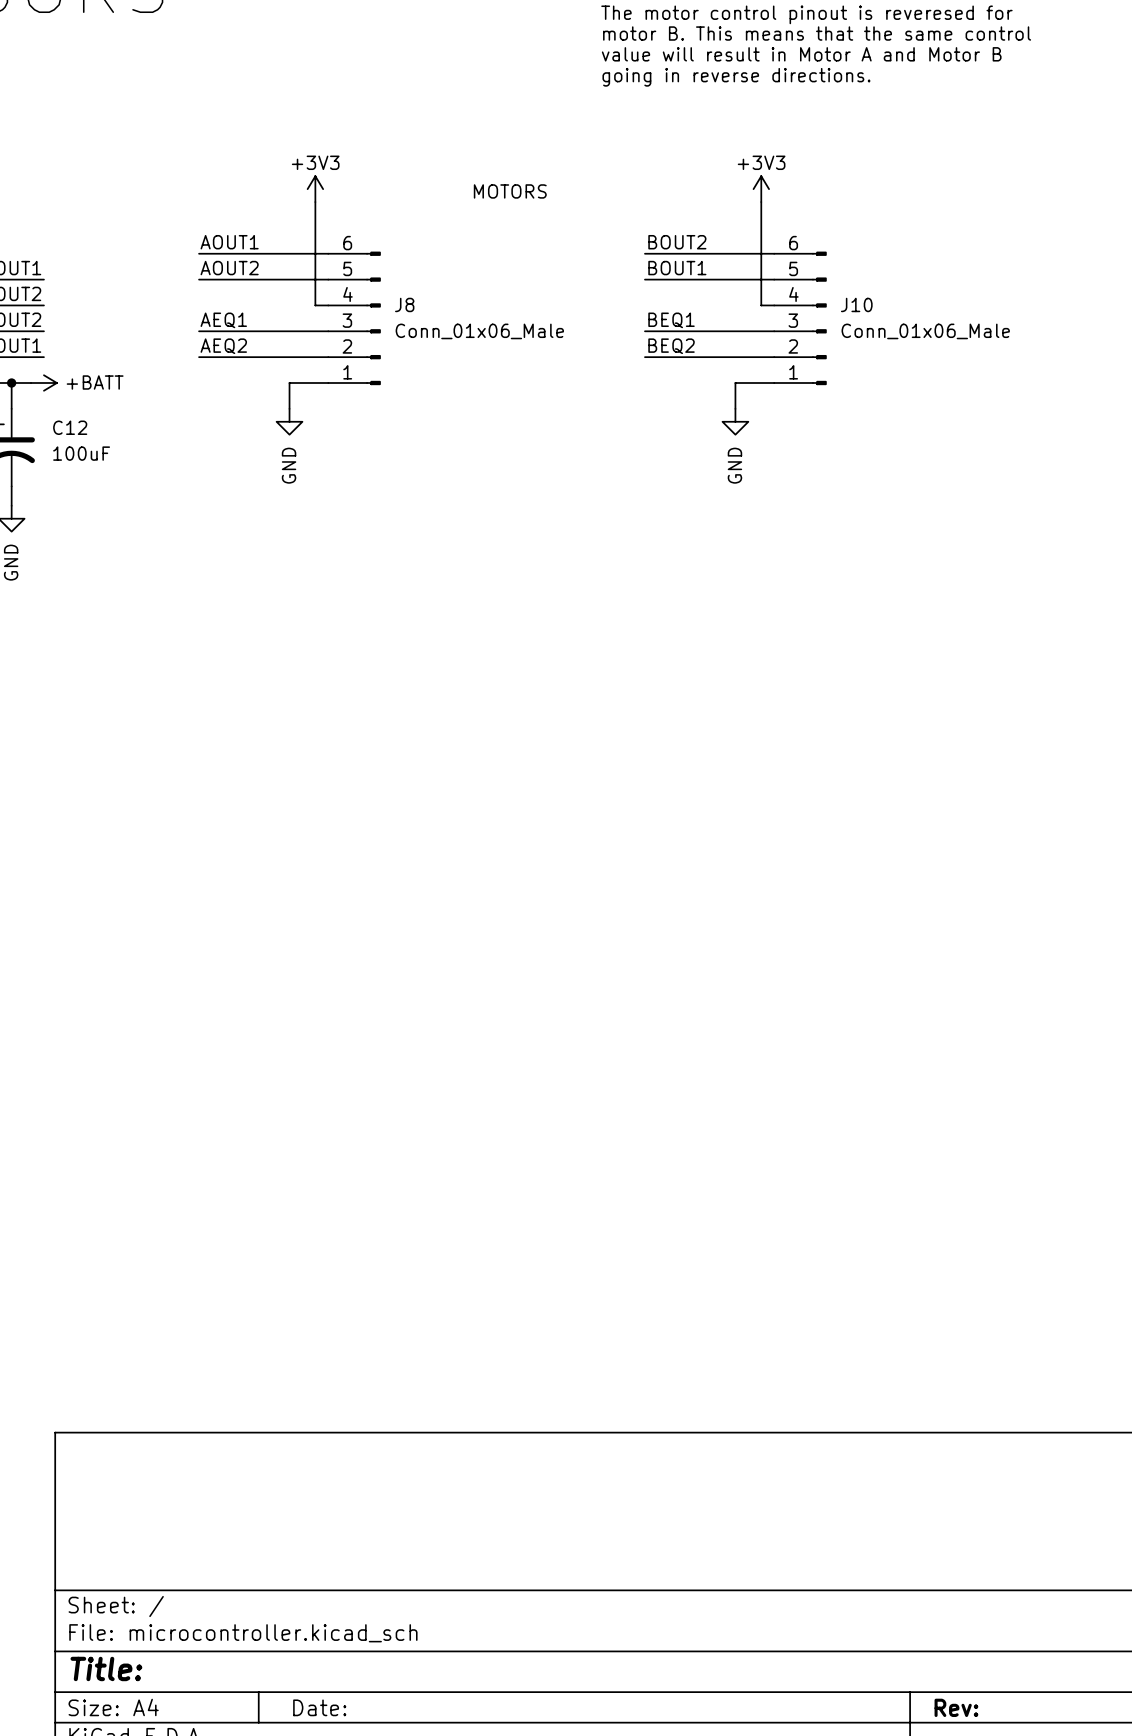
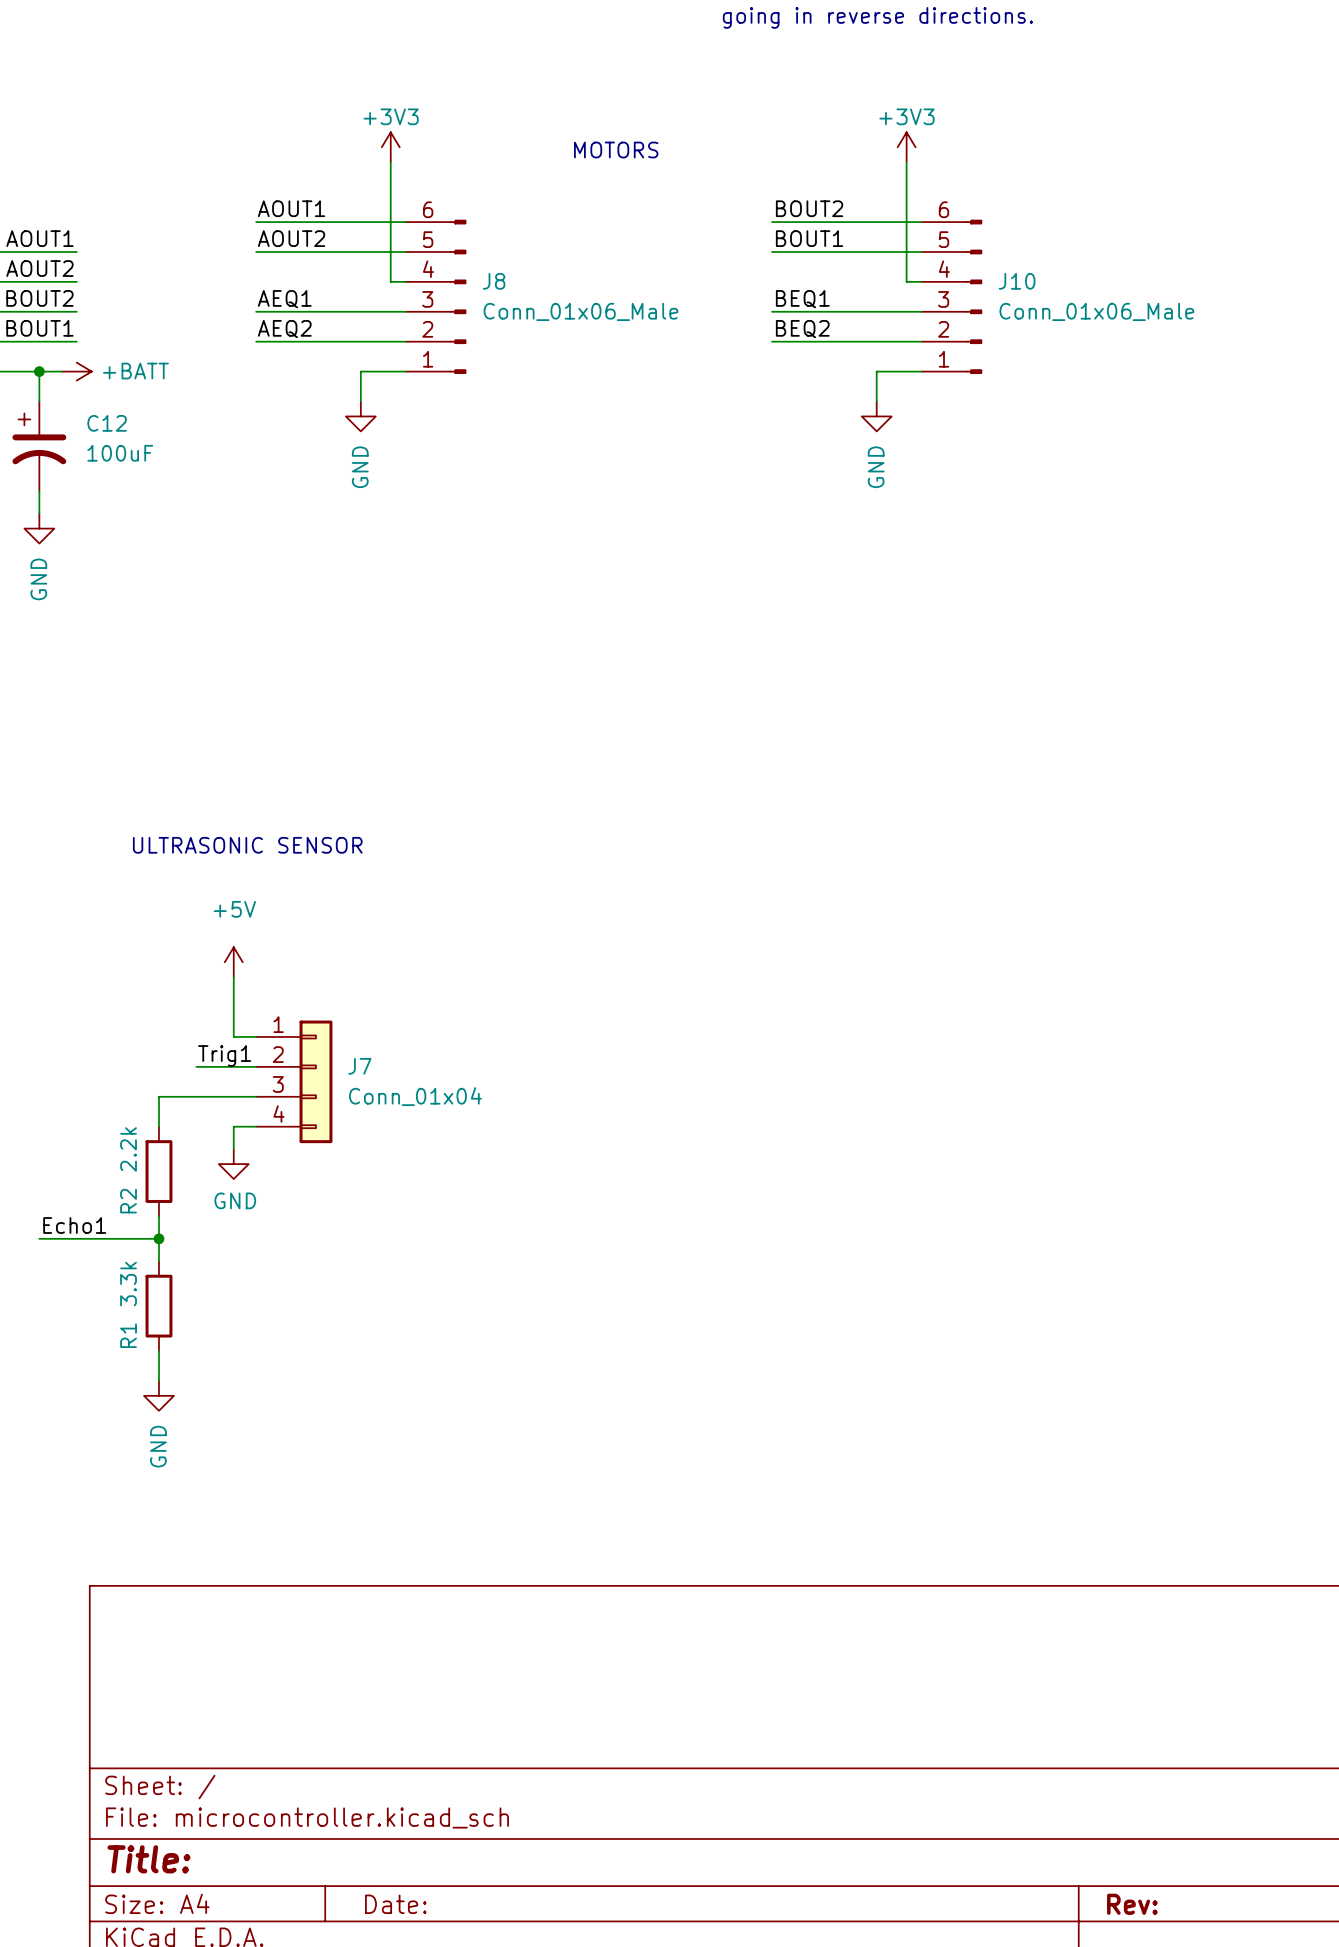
text: none -> ULTRASONIC SENSOR (247, 845)
power symbol: none -> +5V (233, 962)
wire: none -> (233, 977) (233, 1036) (256, 1036)
label: none -> Trig1 (224, 1056)
wire: none -> (196, 1066) (256, 1066)
J7: none -> Conn_01x04 (294, 1081)
wire: none -> (256, 1096) (158, 1096) (158, 1126)
wire: none -> (256, 1126) (233, 1126) (233, 1149)
power symbol: none -> GND (233, 1164)
R2: none -> 2.2k (158, 1171)
wire: none -> (158, 1216) (158, 1261)
label: none -> Echo1 (74, 1225)
wire: none -> (39, 1238) (158, 1238)
junction: none -> (158, 1238)
R1: none -> 3.3k (158, 1306)
wire: none -> (158, 1350) (158, 1380)
power symbol: none -> GND (158, 1395)

